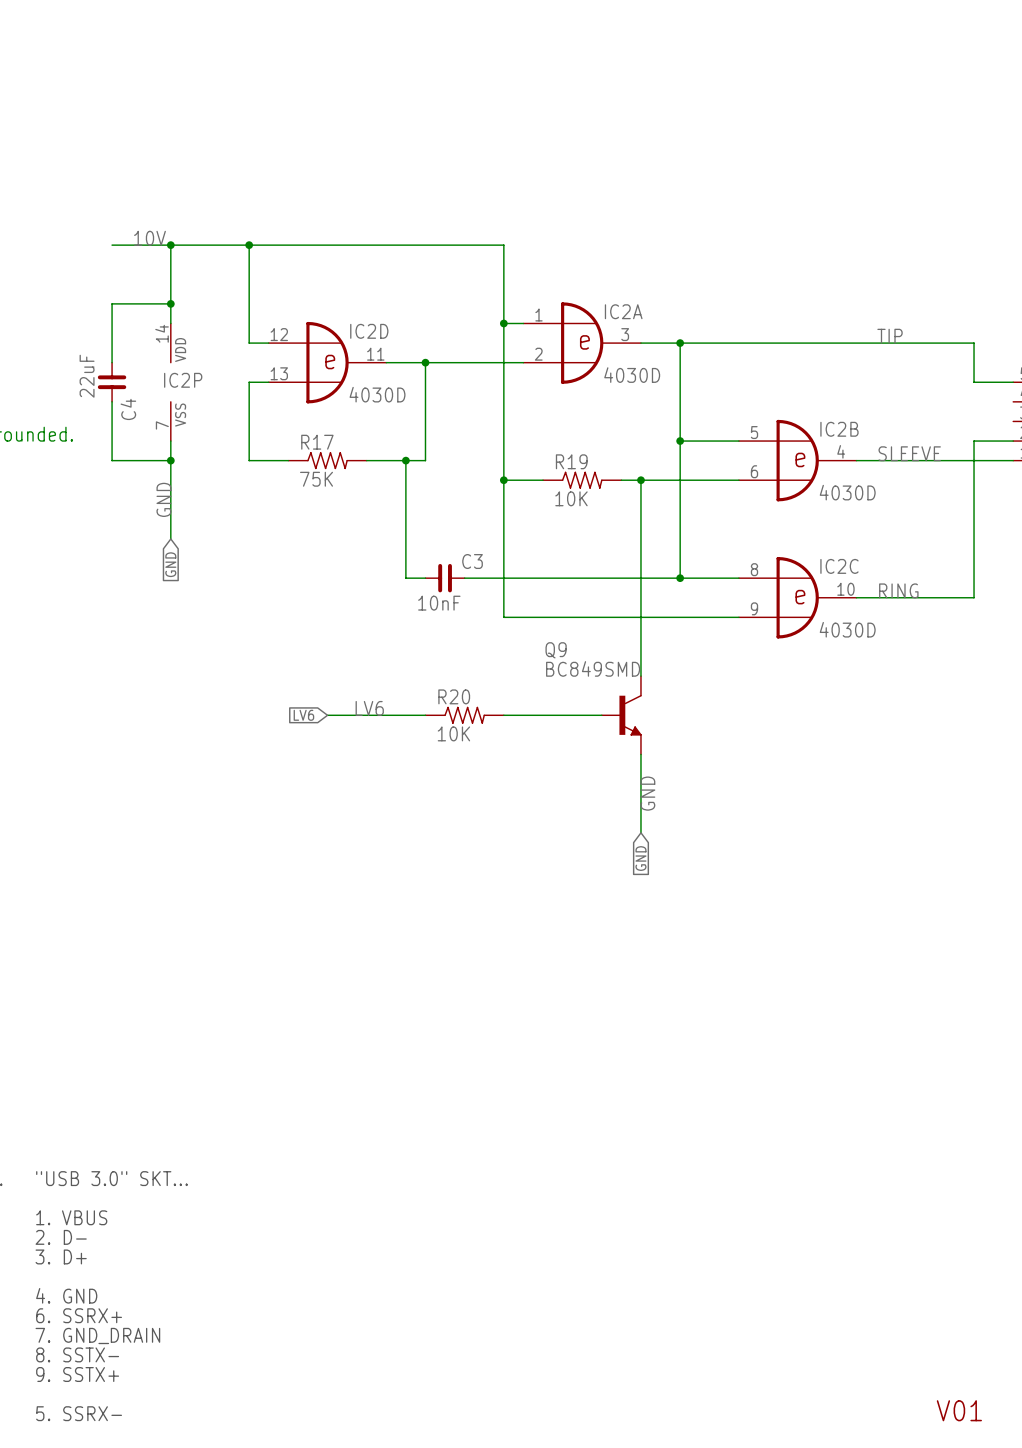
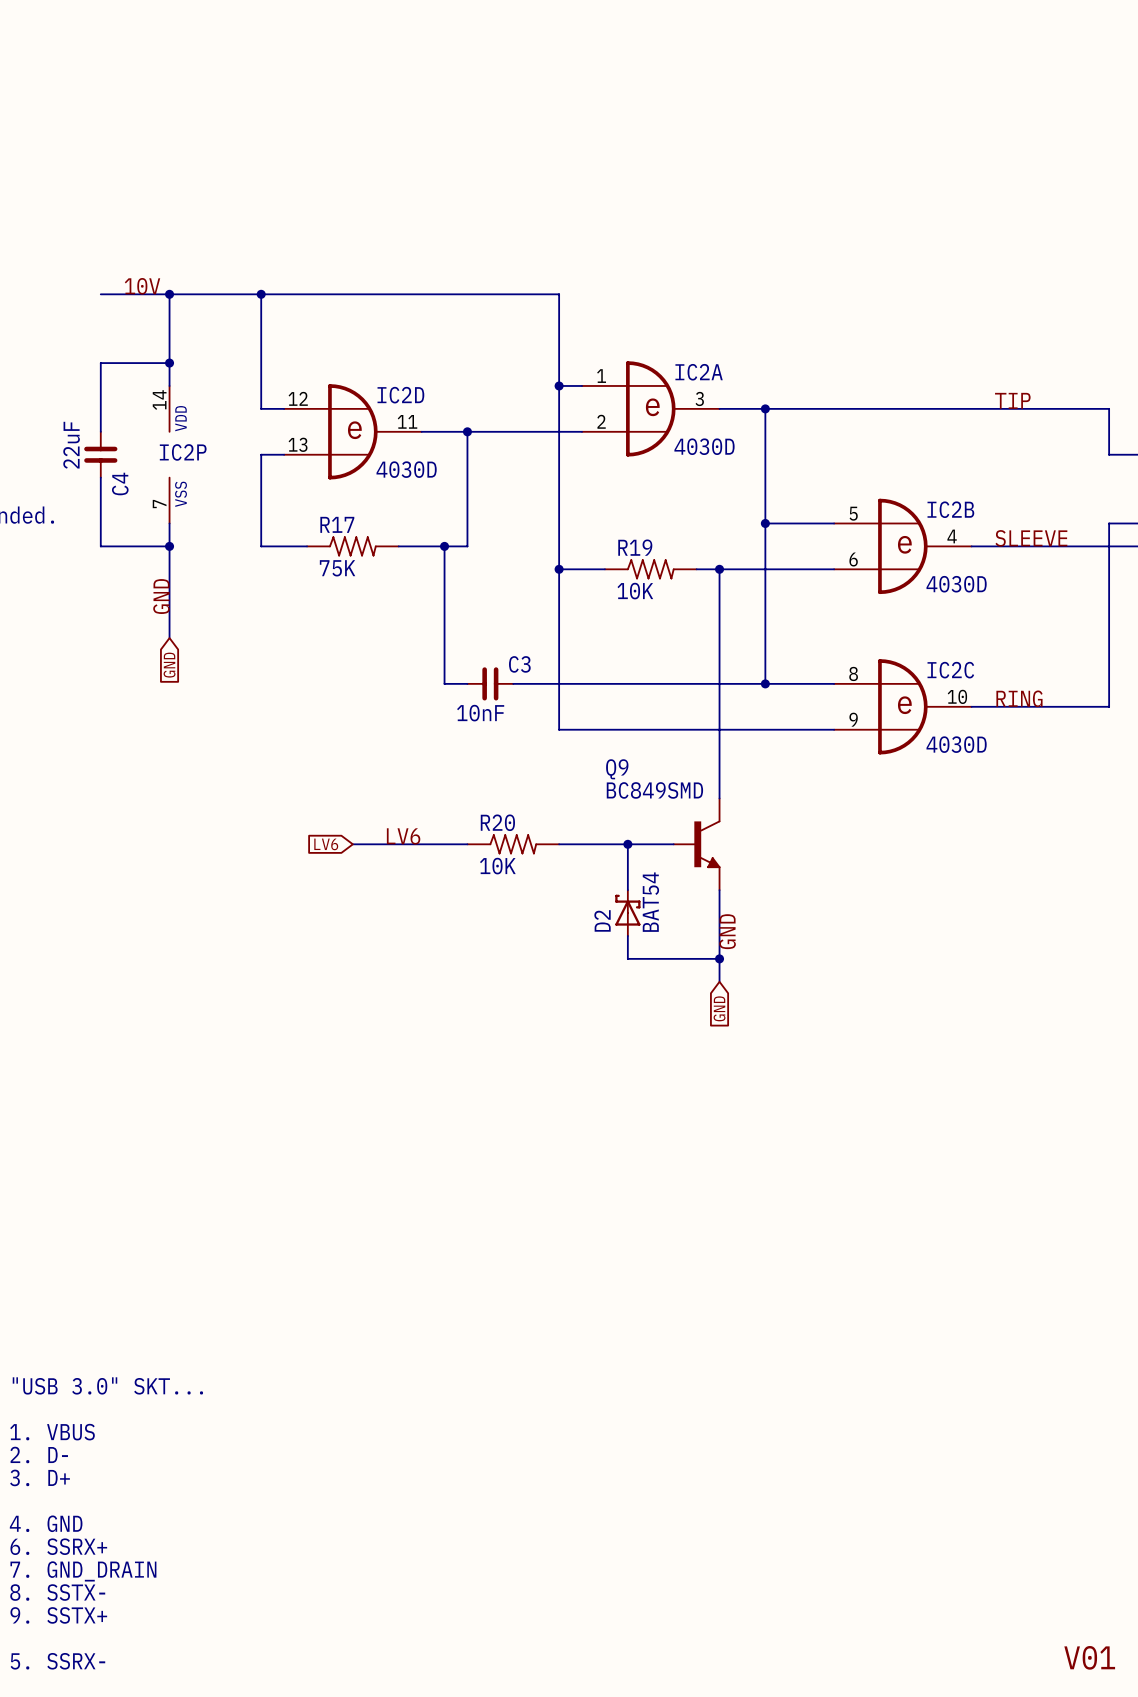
wire: none -> (627, 844) (627, 890)
junction: none -> (627, 844)
D2: none -> BAT54 (627, 913)
wire: none -> (627, 935) (627, 958) (719, 958)
junction: none -> (719, 958)

